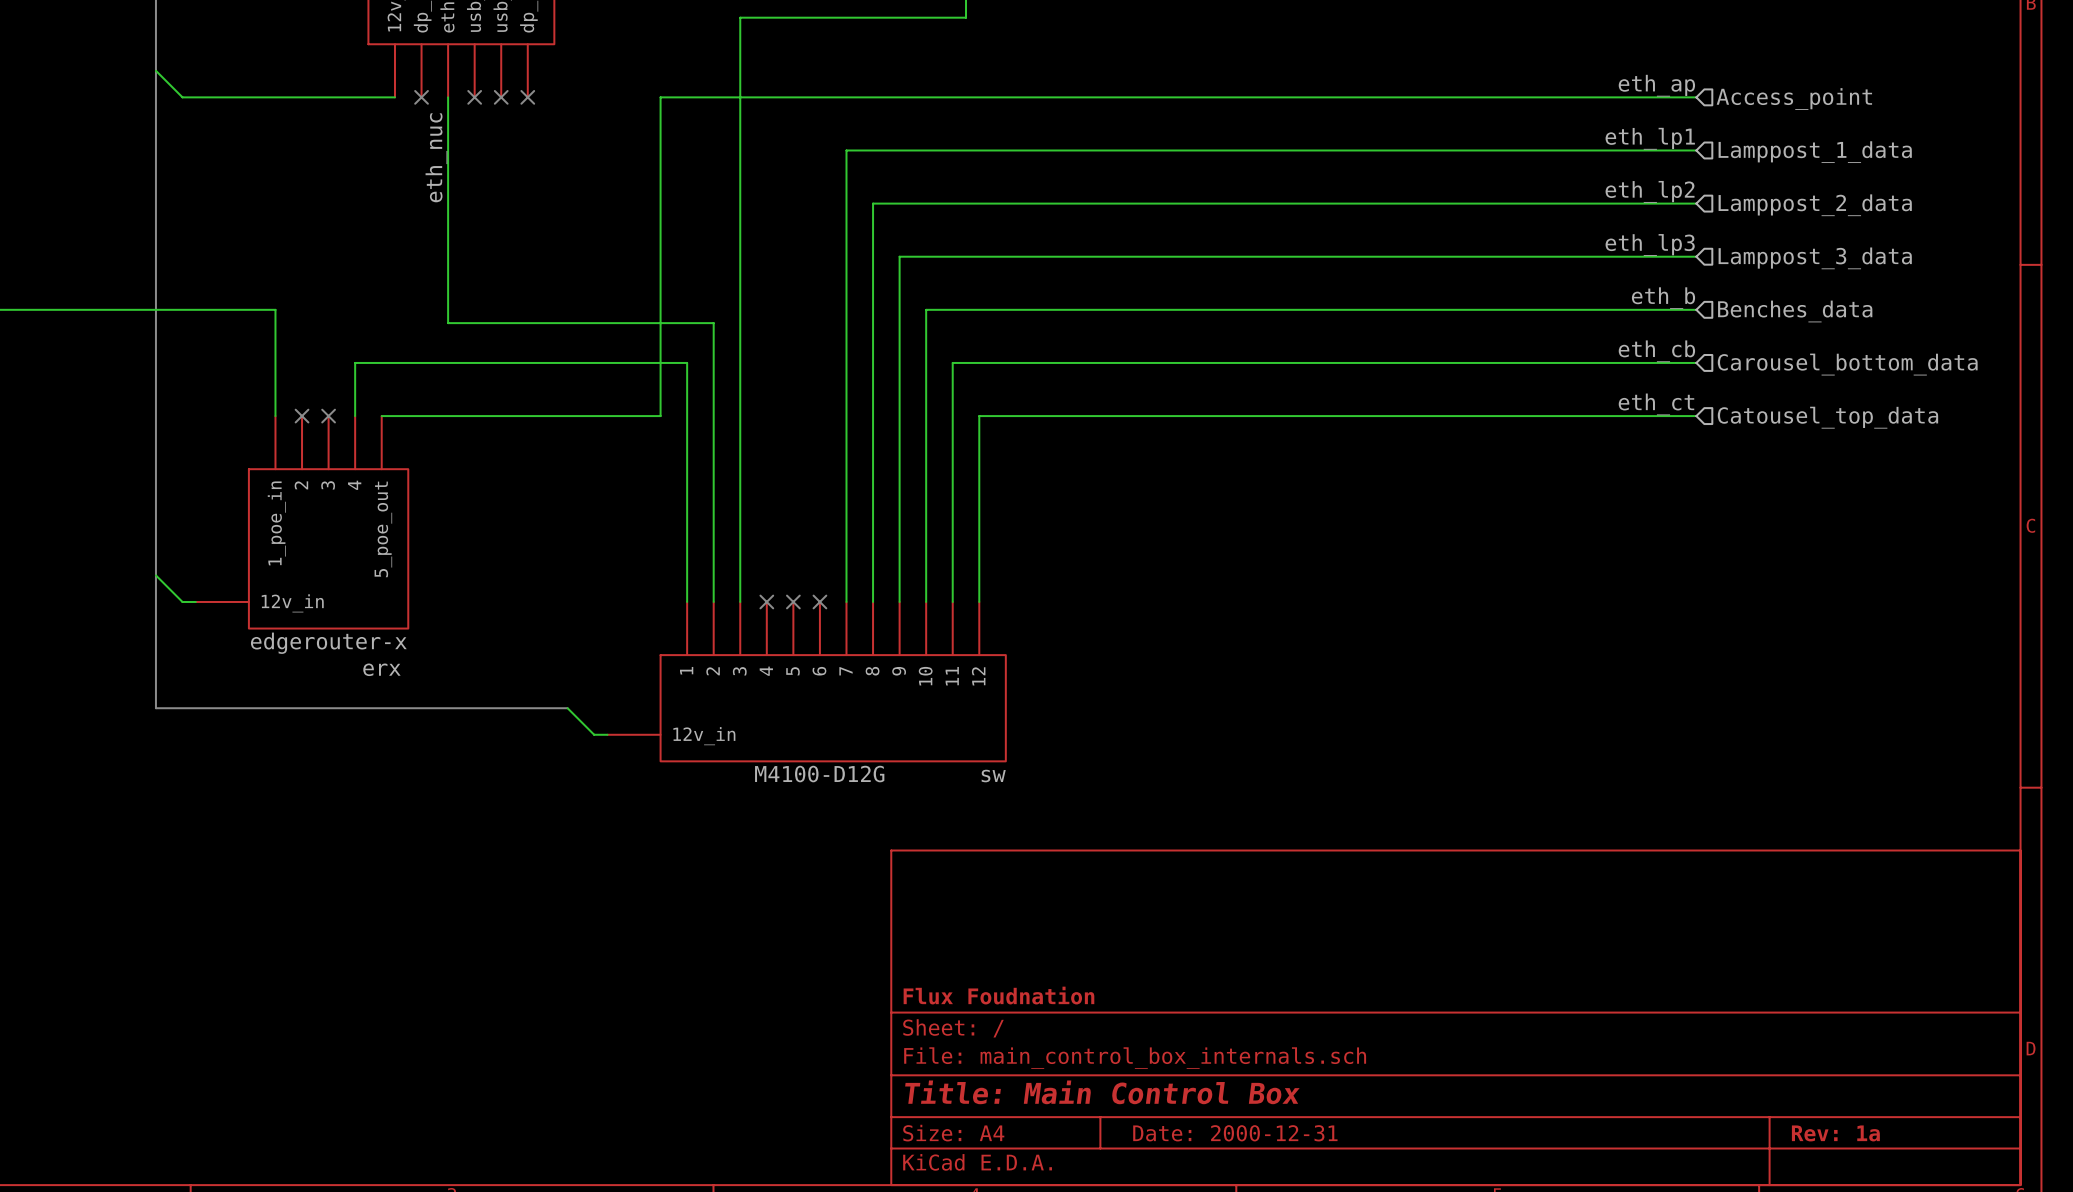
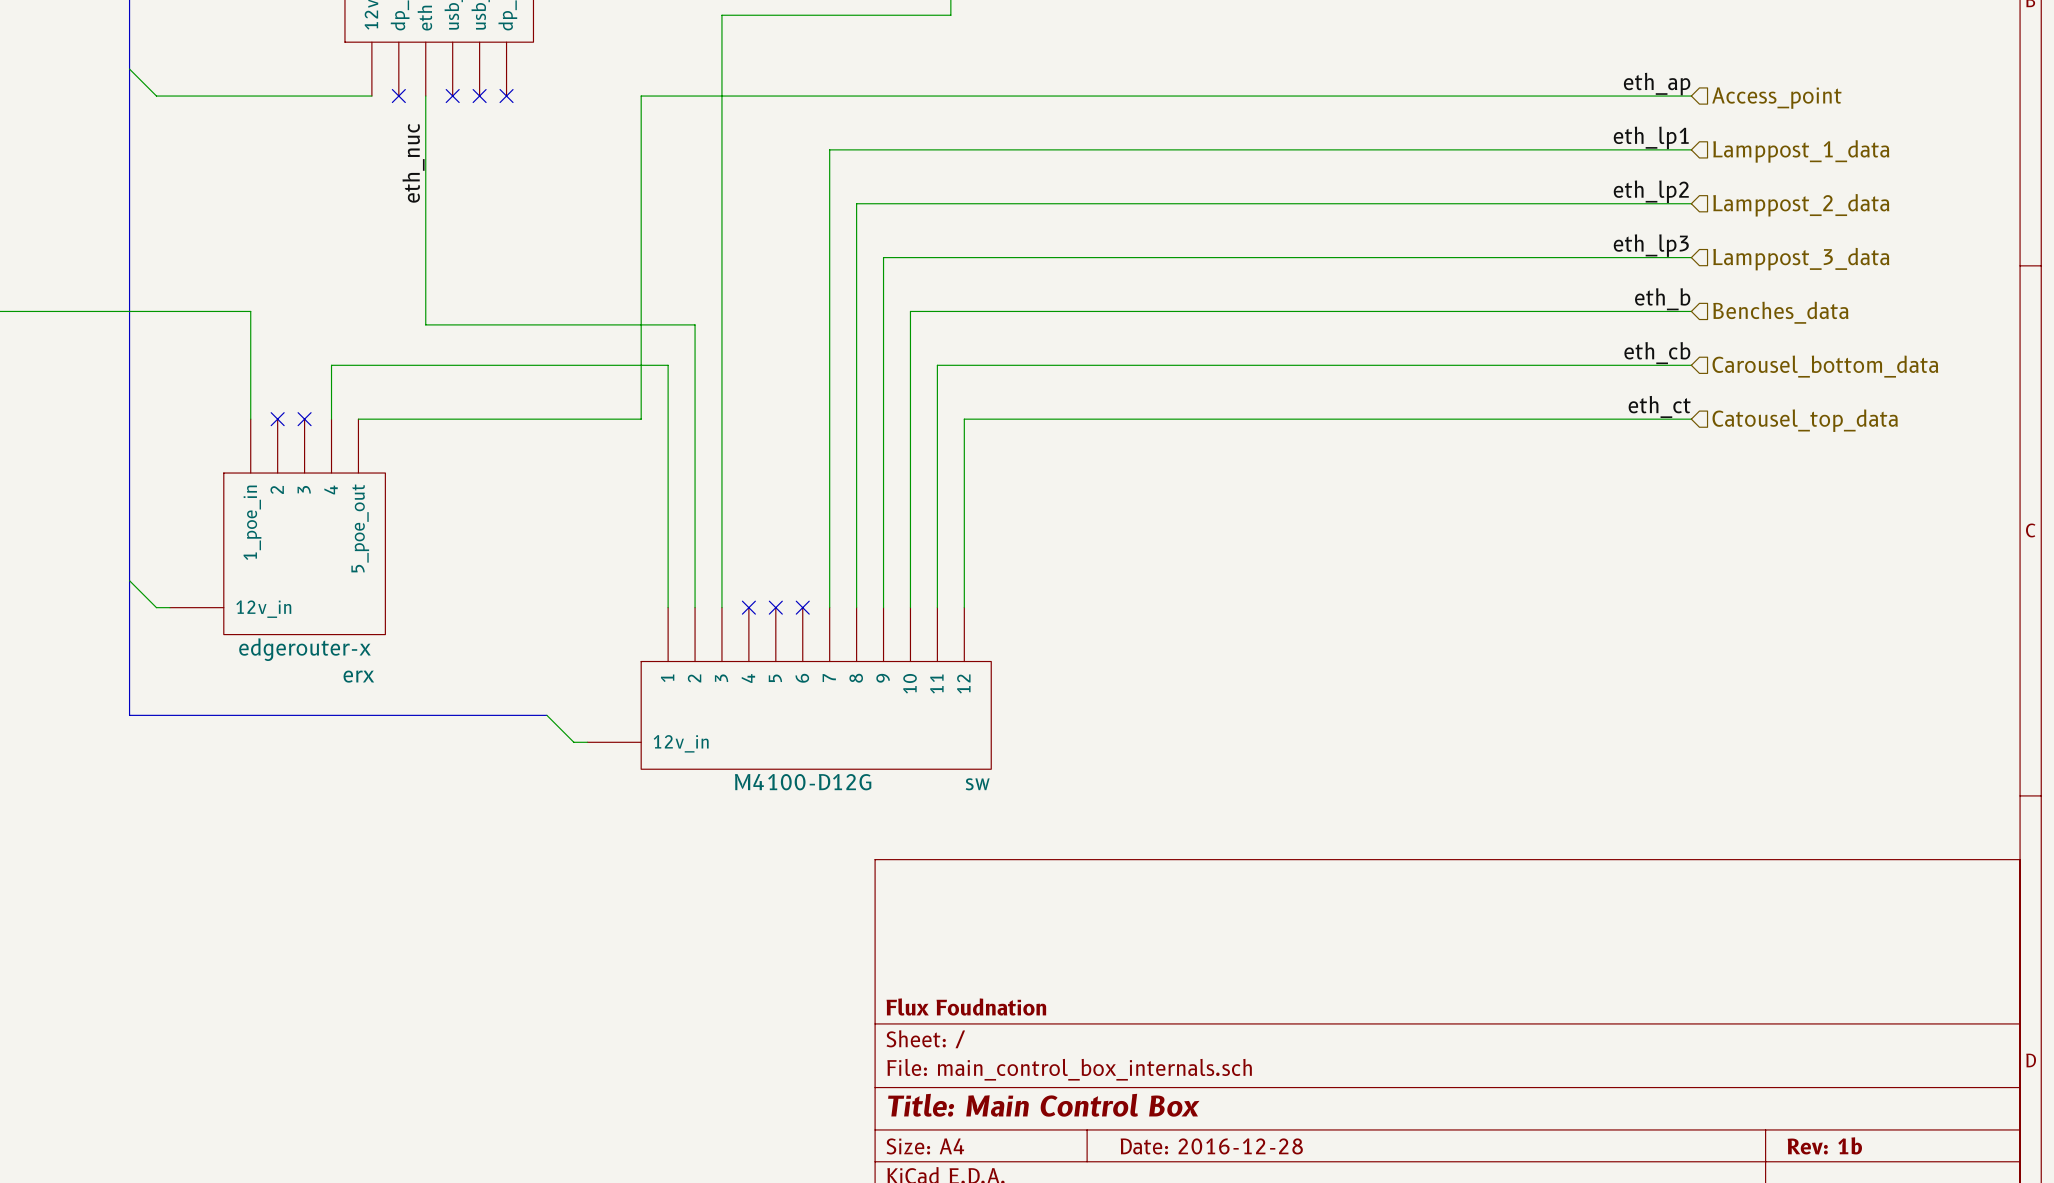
title block: Date: 2000-12-31 (1235, 1133) -> Date: 2016-12-28 (1211, 1146)
title block: Rev: 1a (1835, 1133) -> Rev: 1b (1824, 1145)

